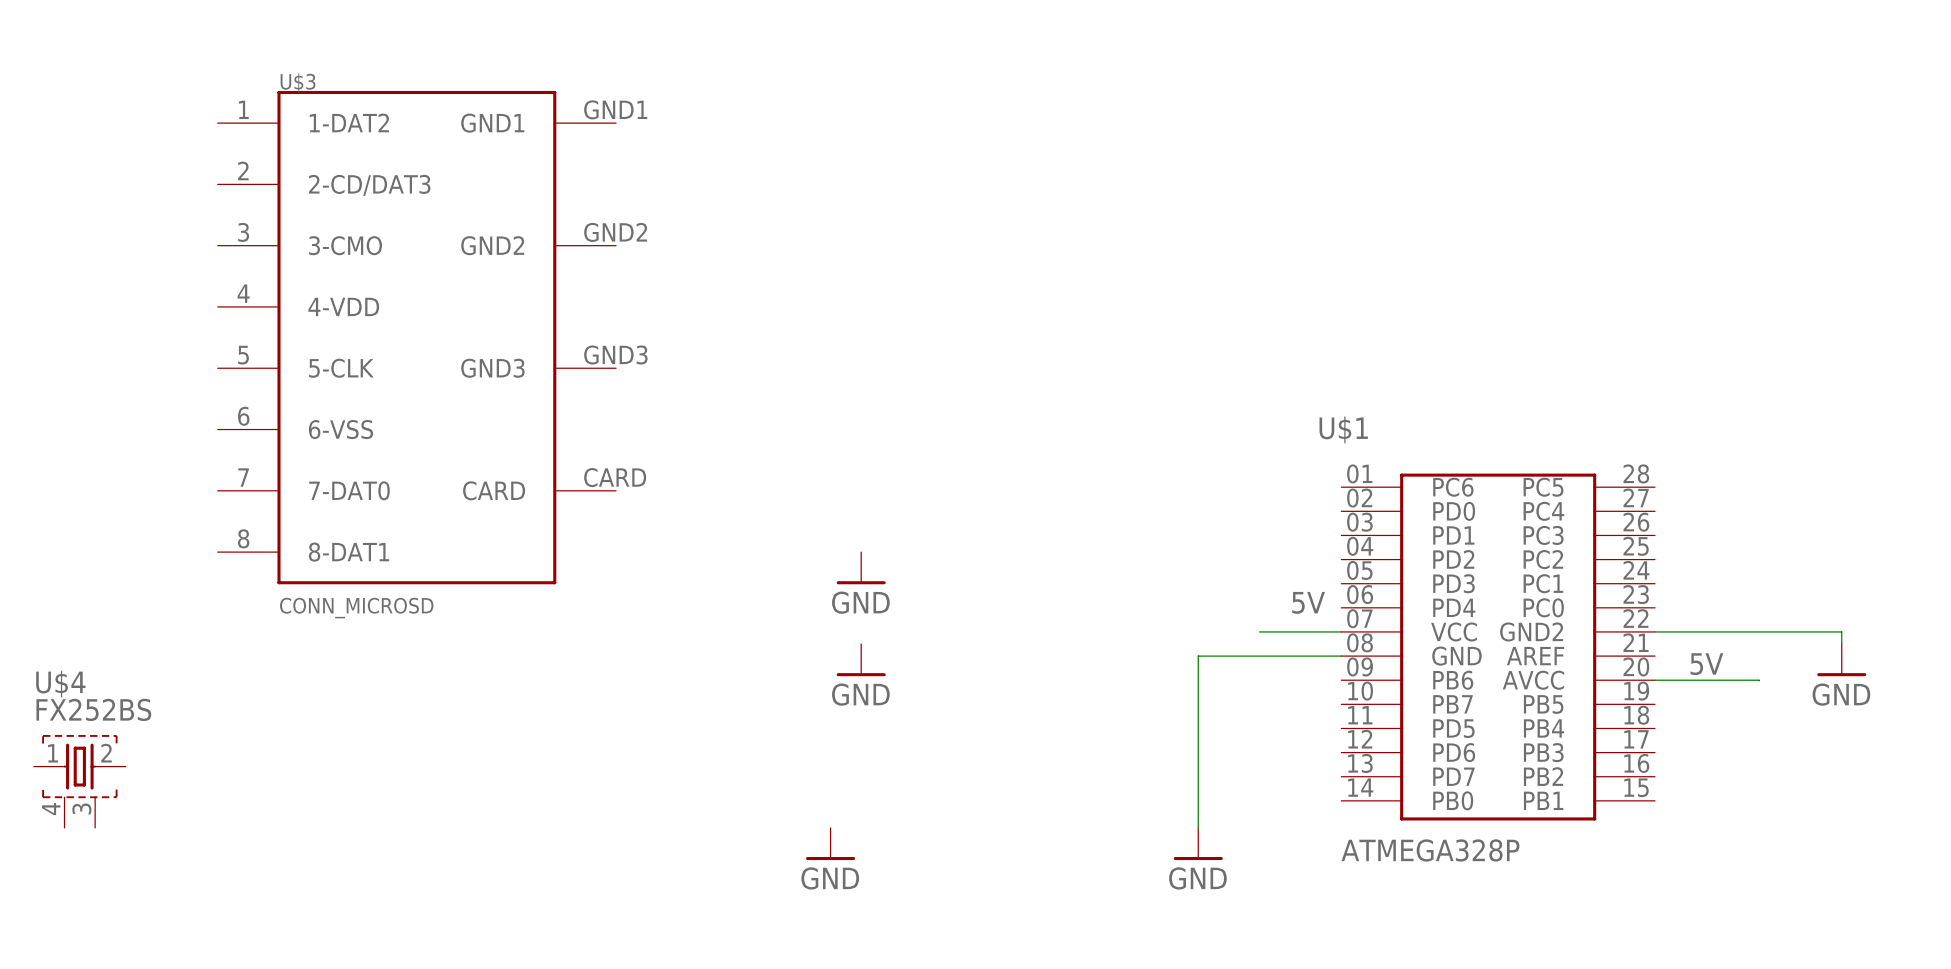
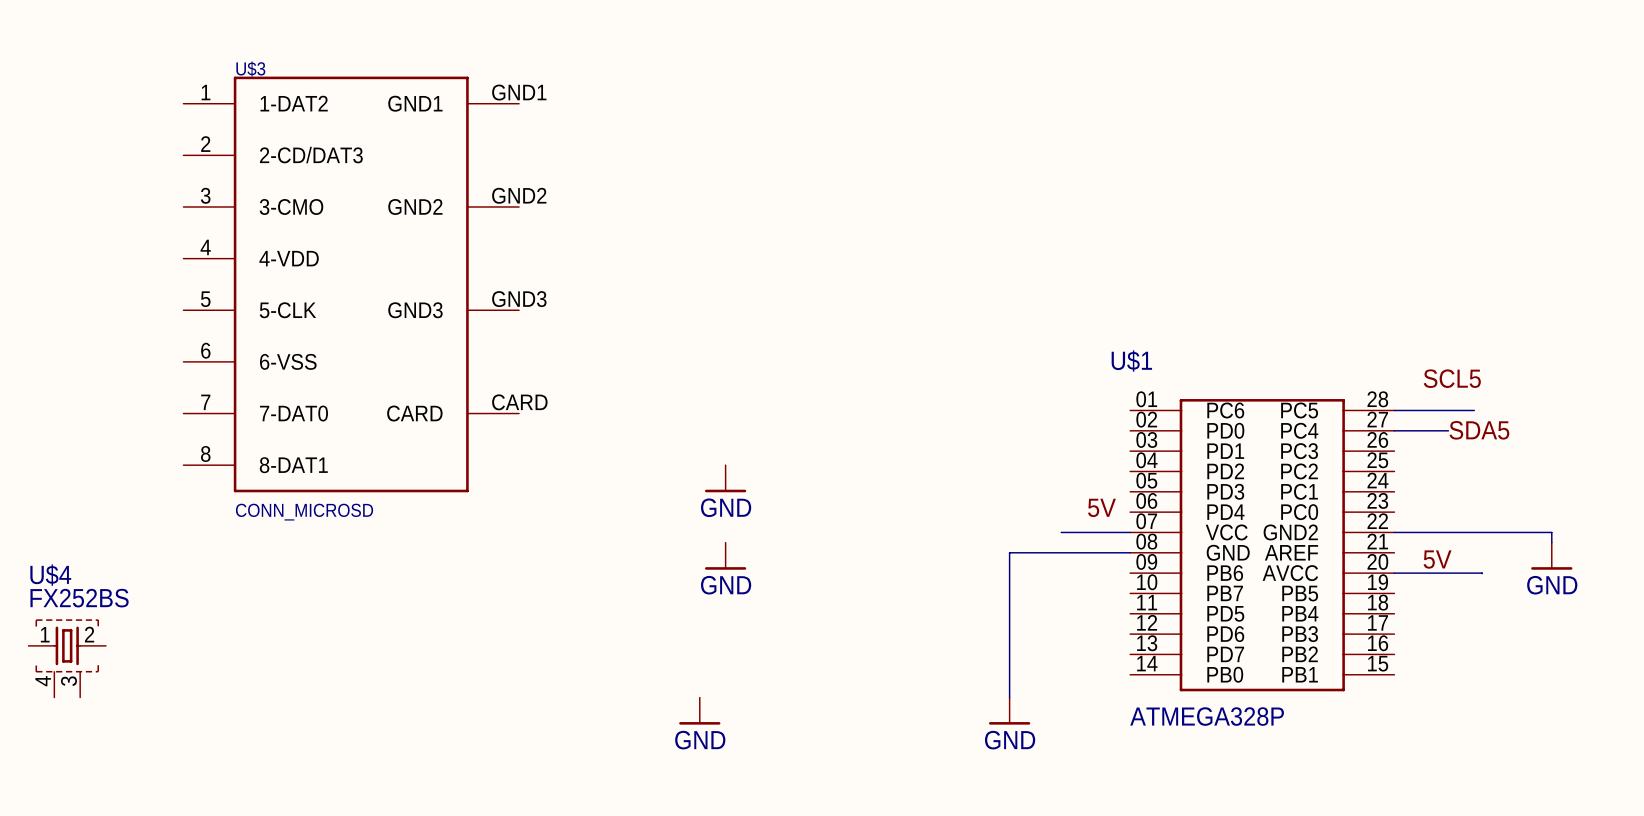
label: none -> SCL5 (1452, 378)
wire: none -> (1394, 410) (1474, 410)
label: none -> SDA5 (1479, 430)
wire: none -> (1394, 430) (1448, 430)

